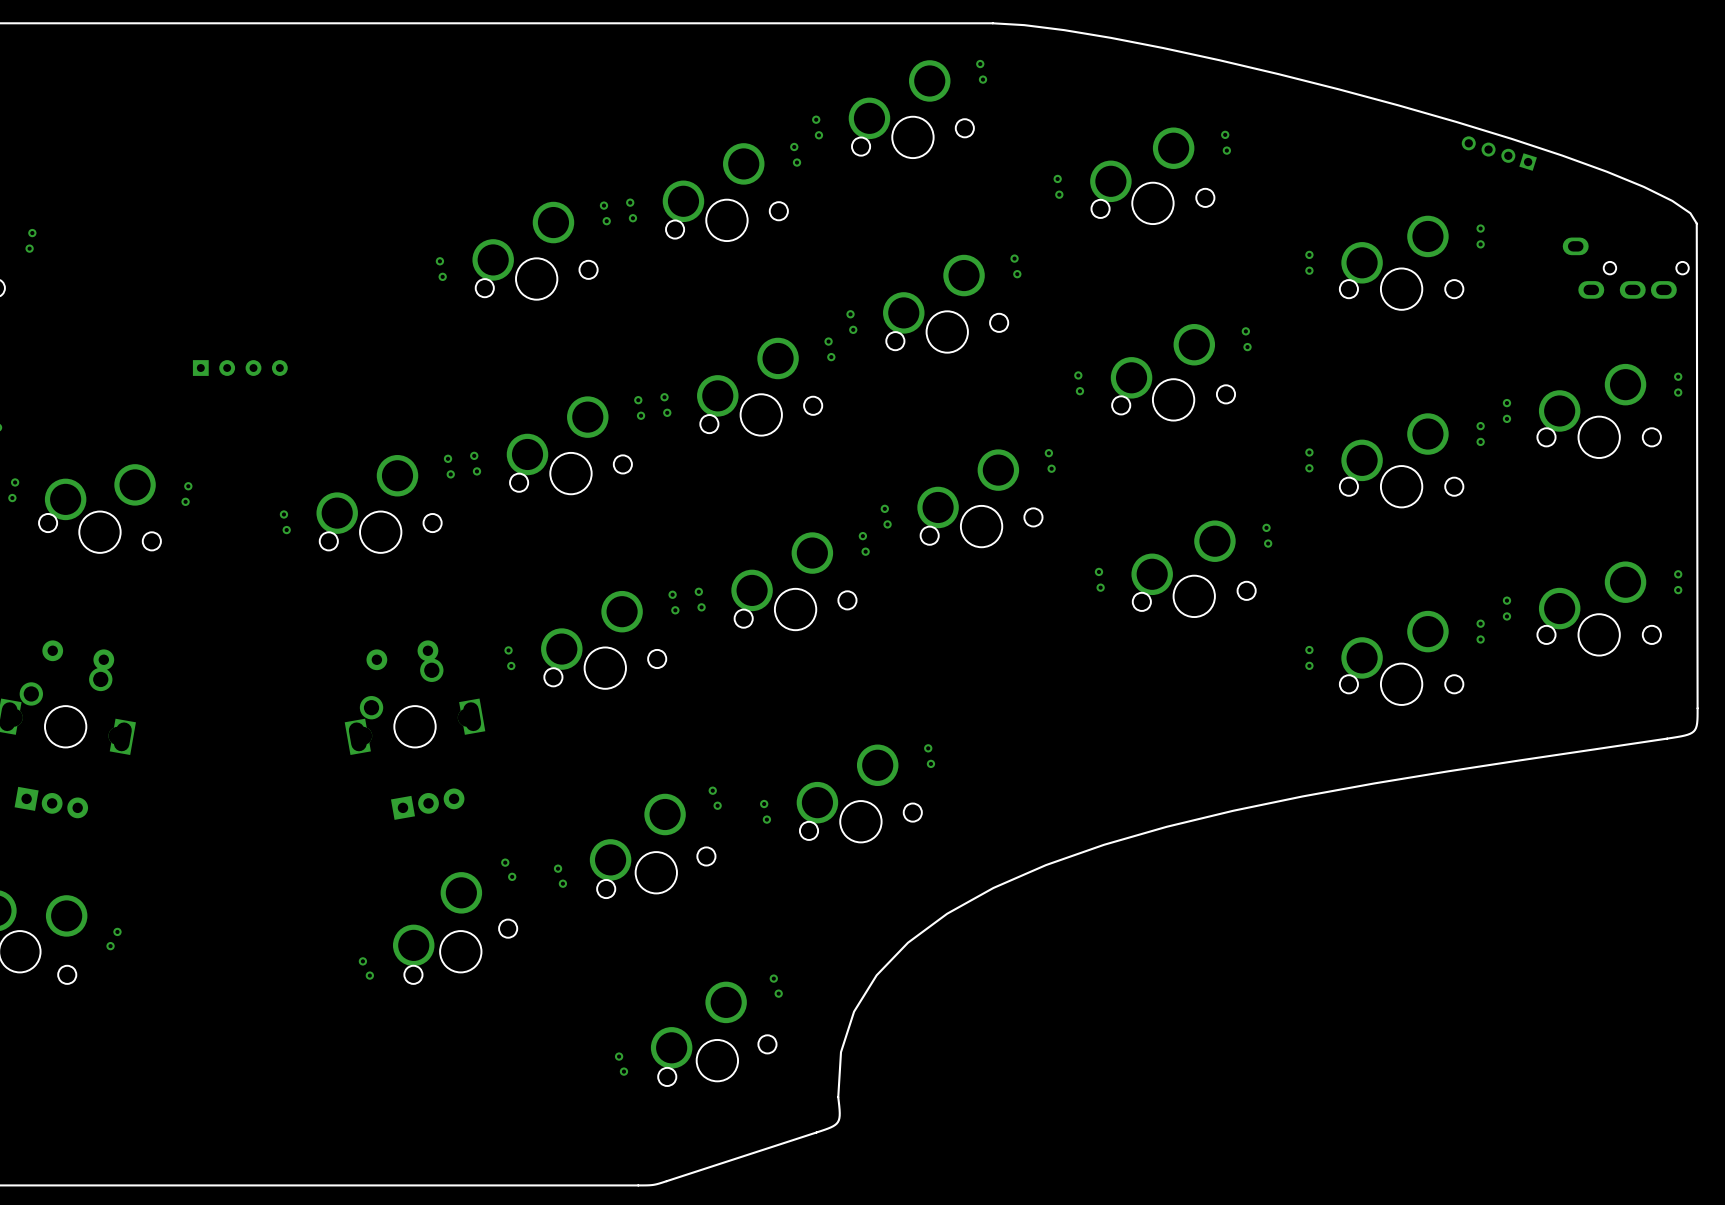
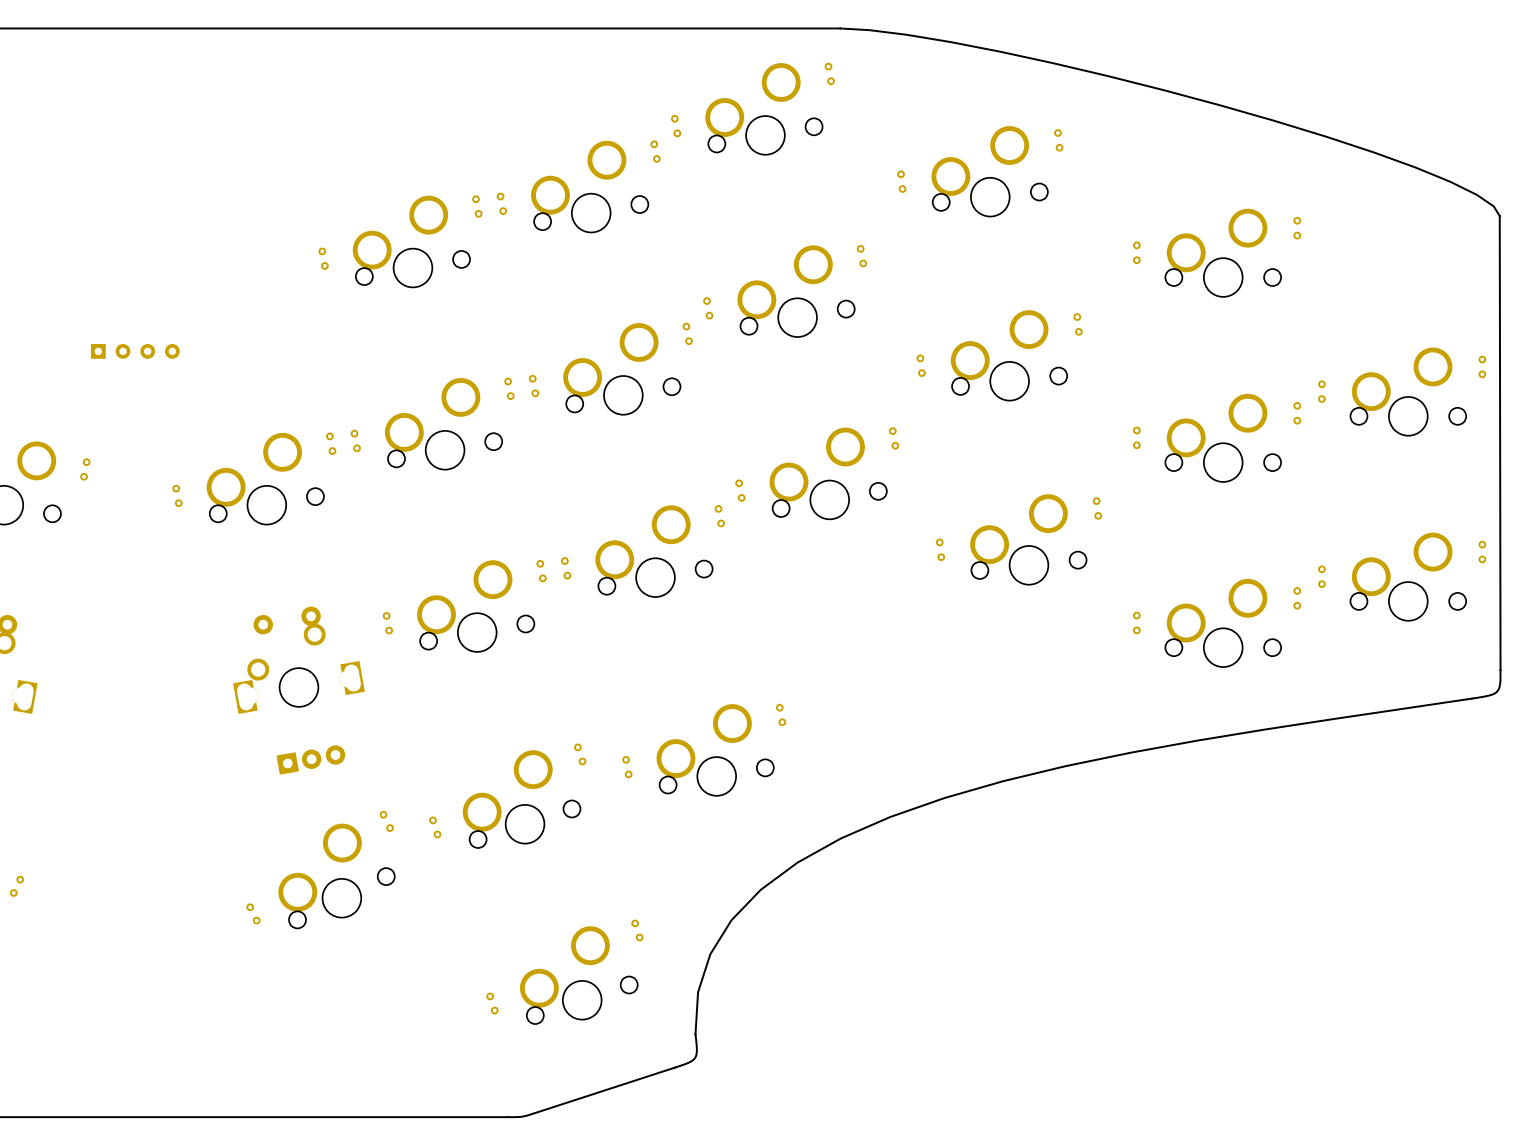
part: (1499, 153) -> none
part: (1625, 268) -> none

